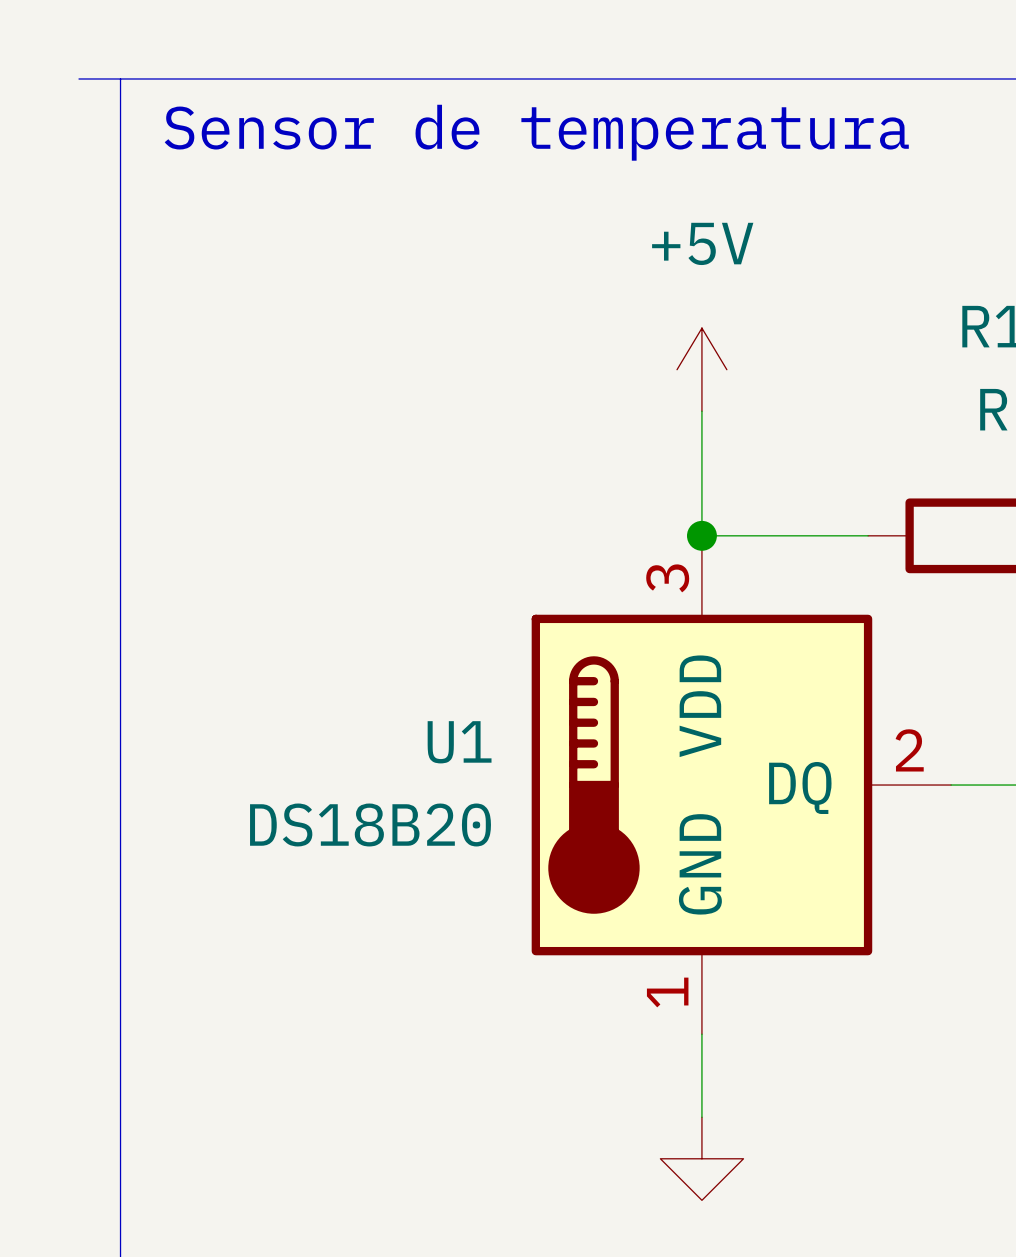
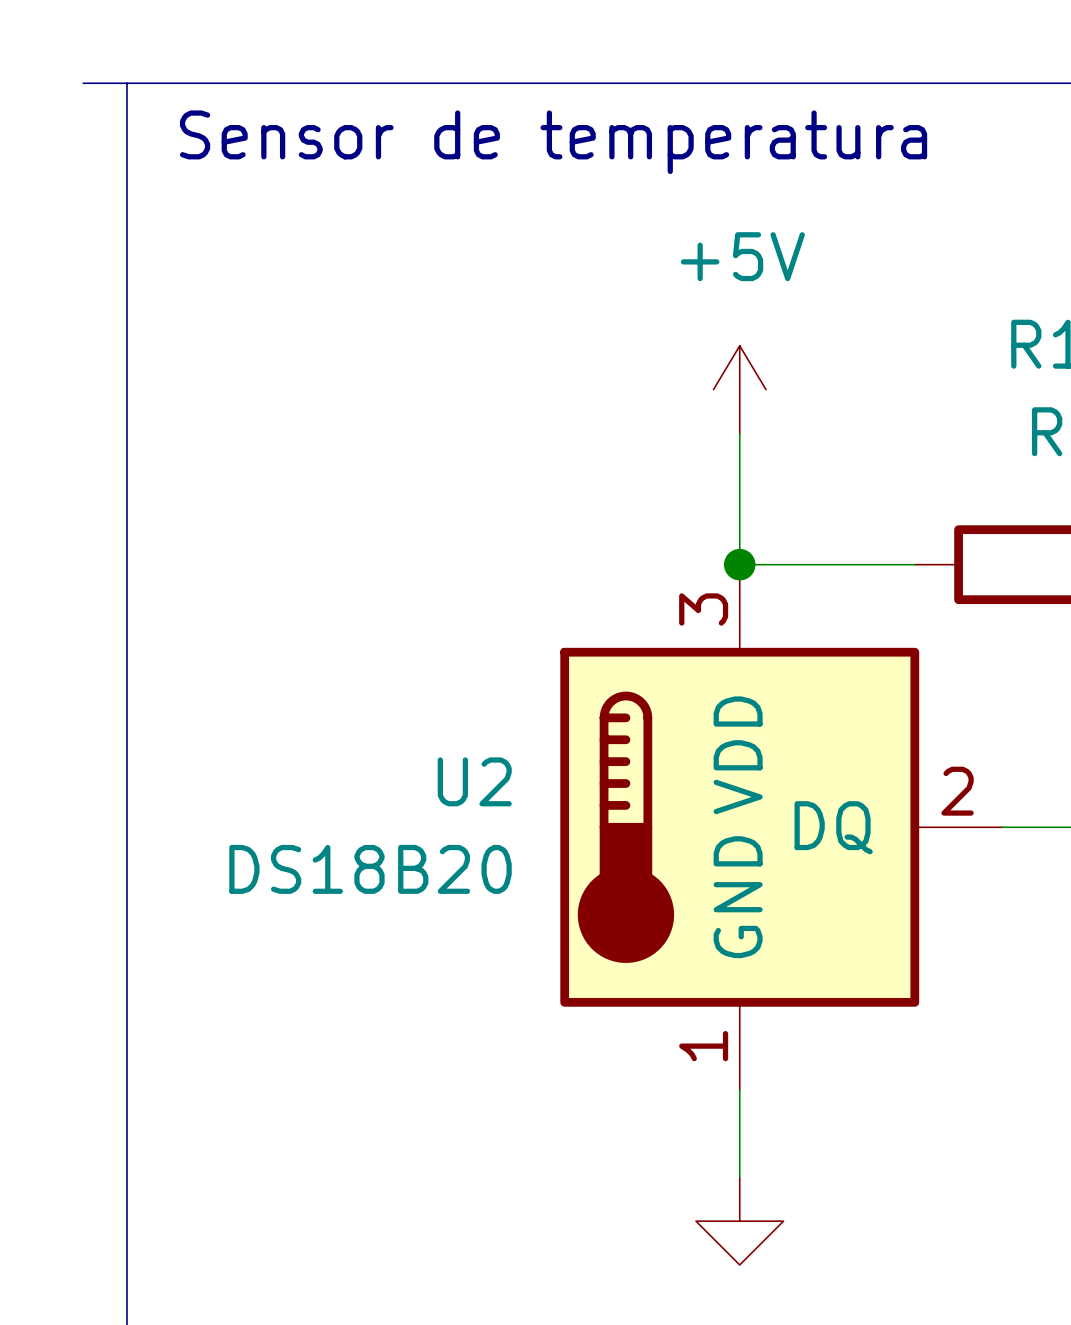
U1 name: U1 (459, 742) -> U2 (474, 781)

